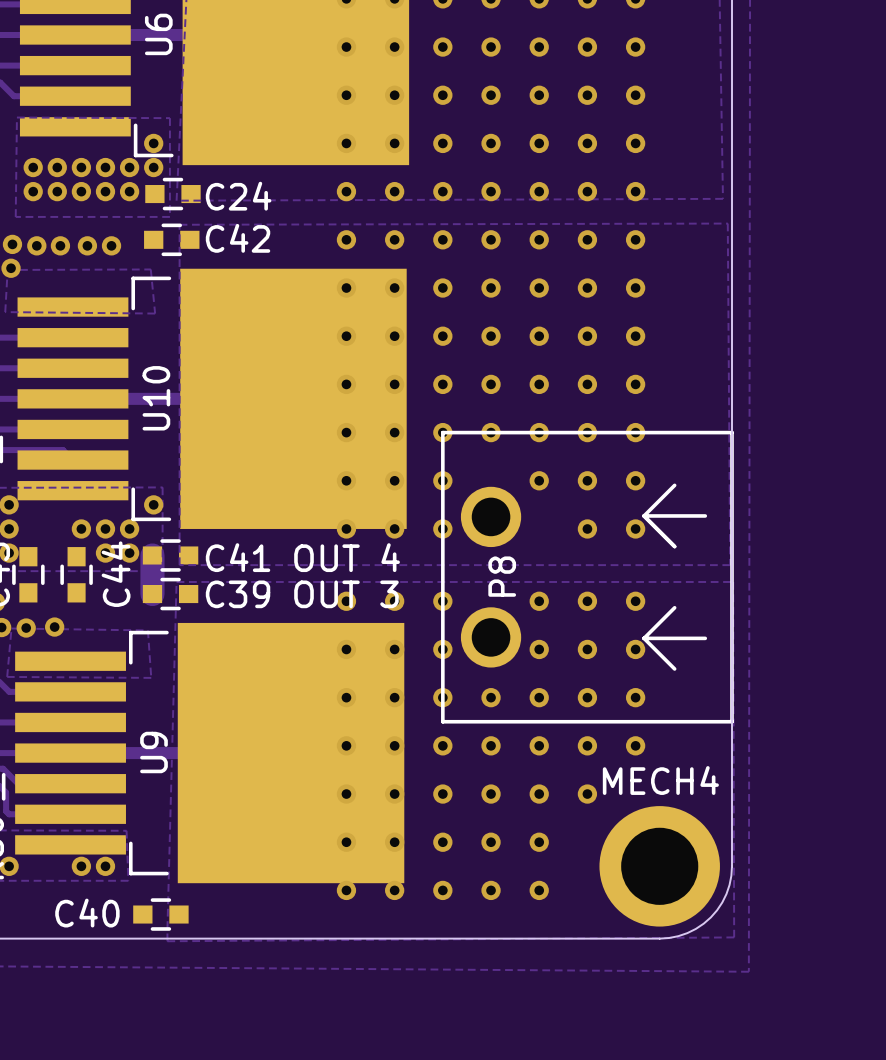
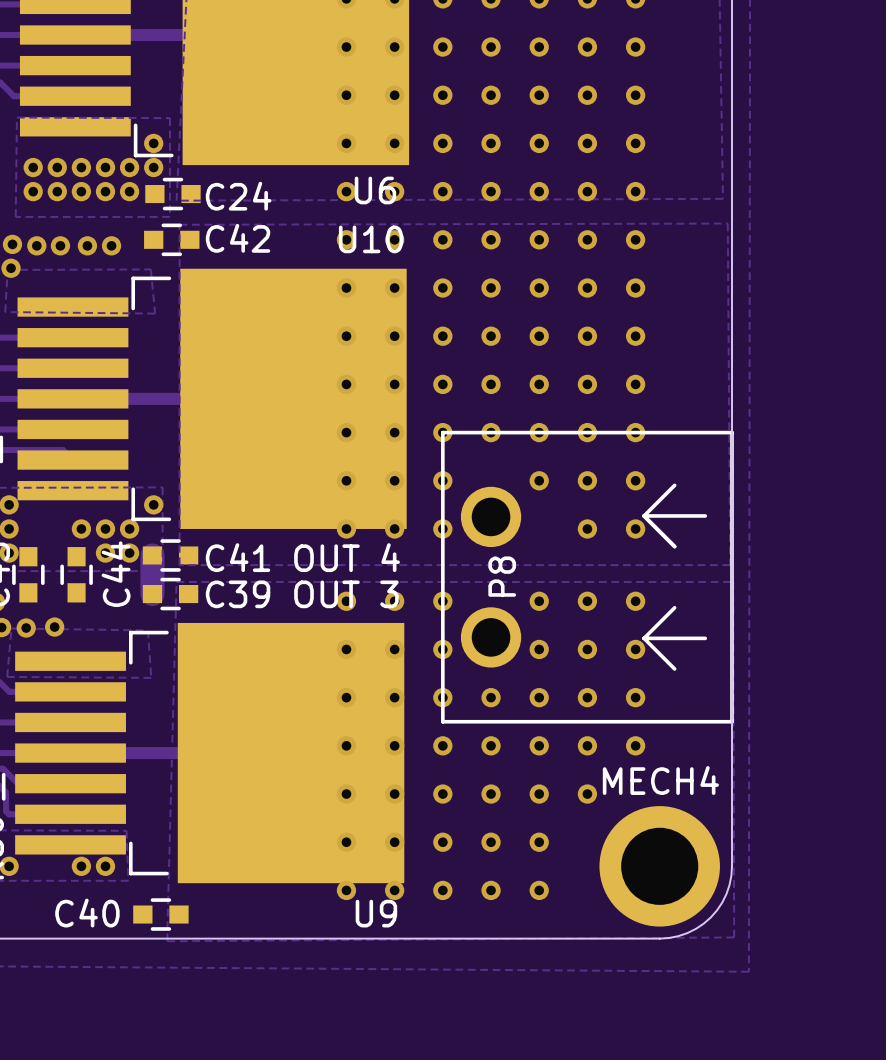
U6 name rotation: 0° (158, 34) -> 90° clockwise (375, 190)
U6 name position: U6 (158, 34) -> U6 (375, 190)
U10 name rotation: 0° (156, 398) -> 90° clockwise (371, 239)
U10 name position: U10 (156, 398) -> U10 (371, 239)
U9 name rotation: 0° (153, 752) -> 90° clockwise (376, 913)
U9 name position: U9 (153, 752) -> U9 (376, 913)

